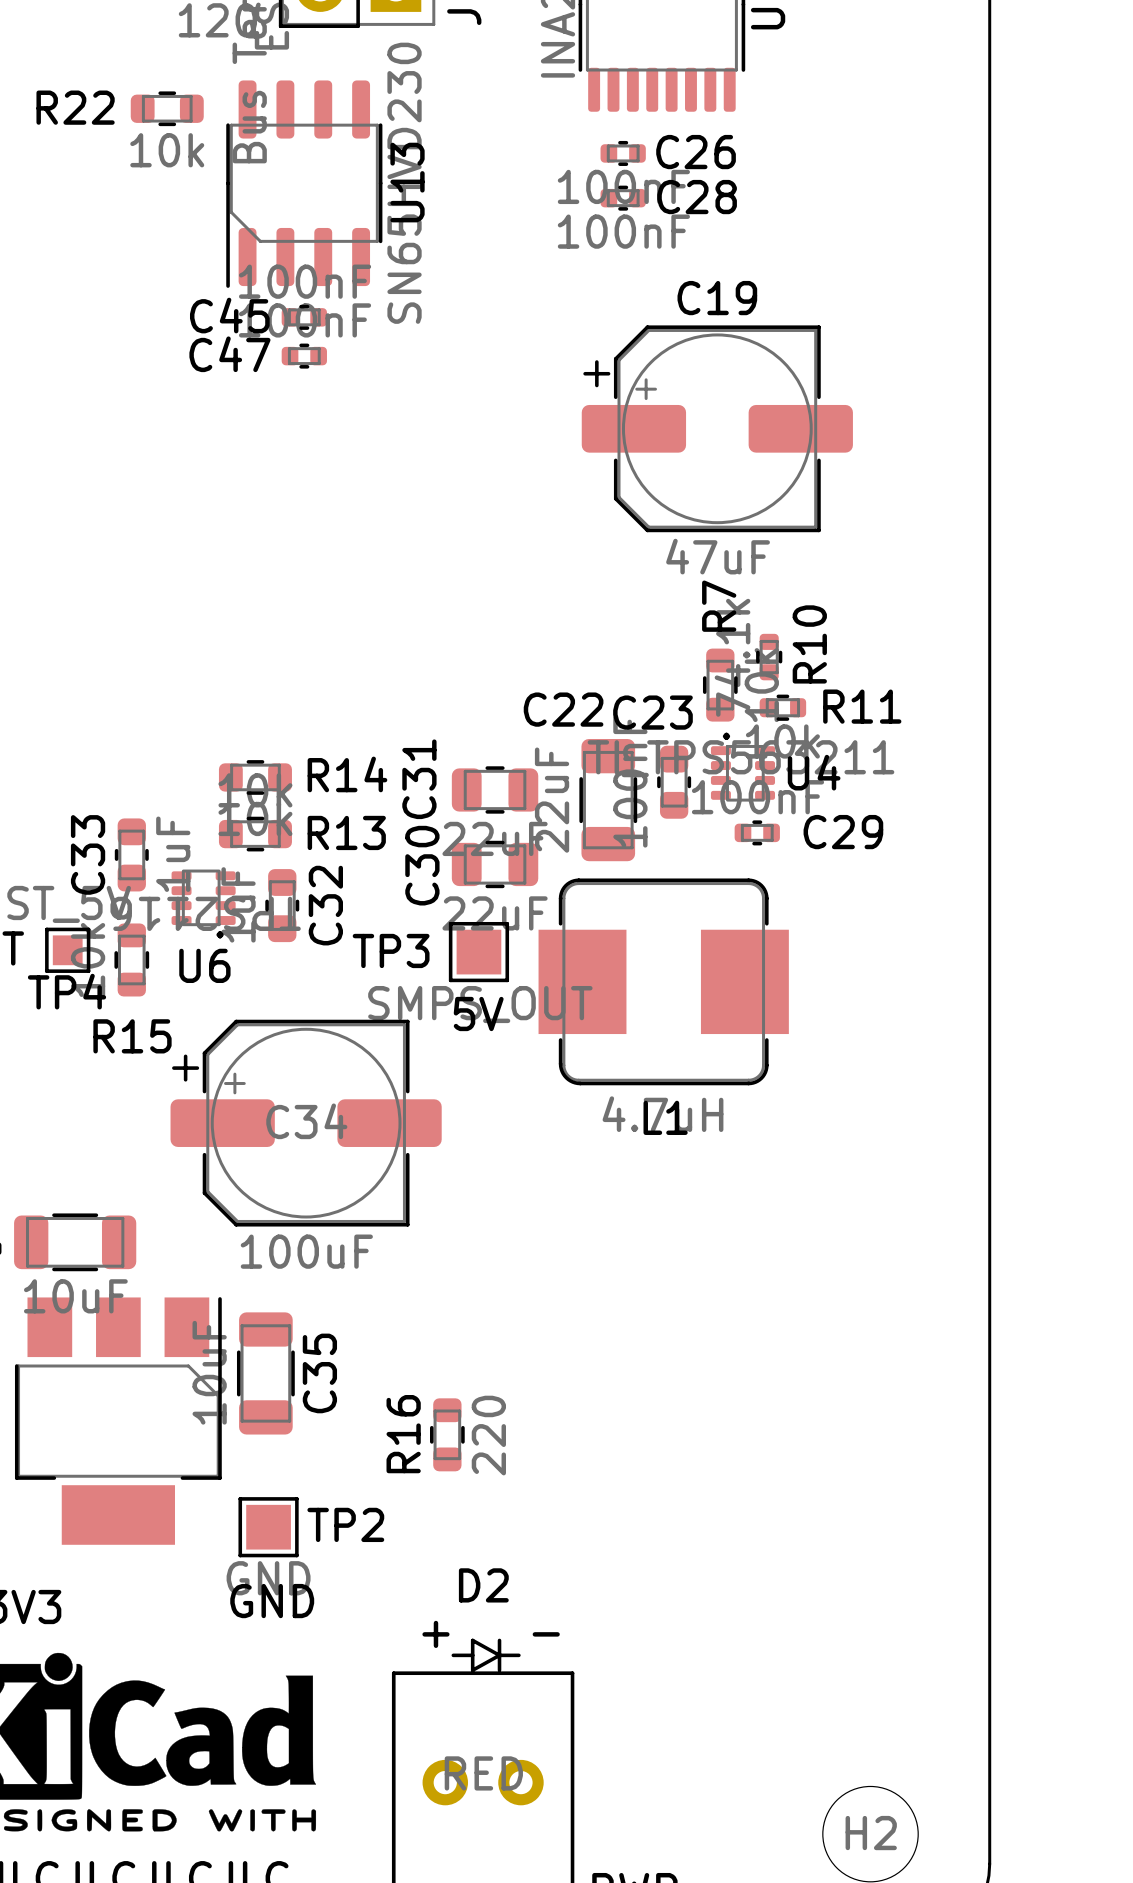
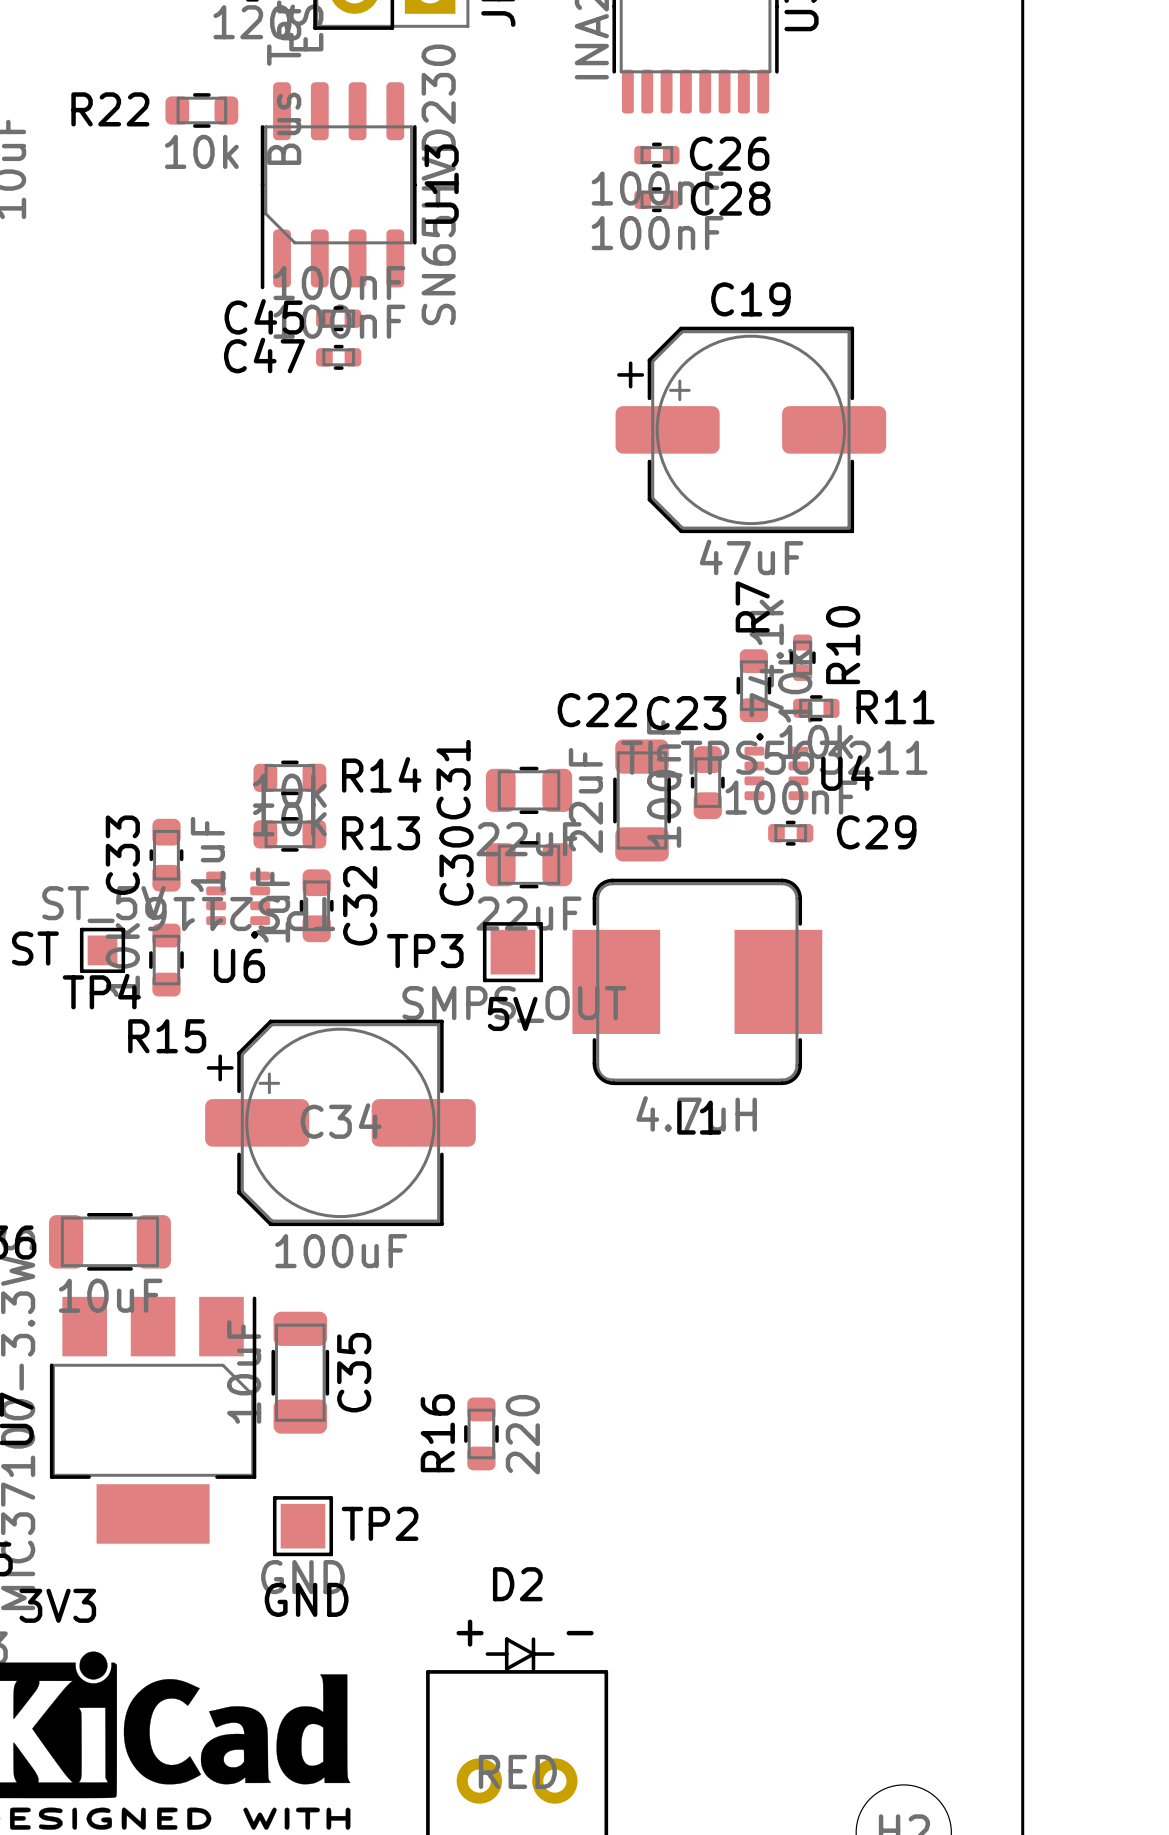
U4 footprint: [710, 744, 776, 802] -> [744, 746, 809, 801]
U6 footprint: [171, 869, 236, 927] -> [206, 871, 271, 926]

